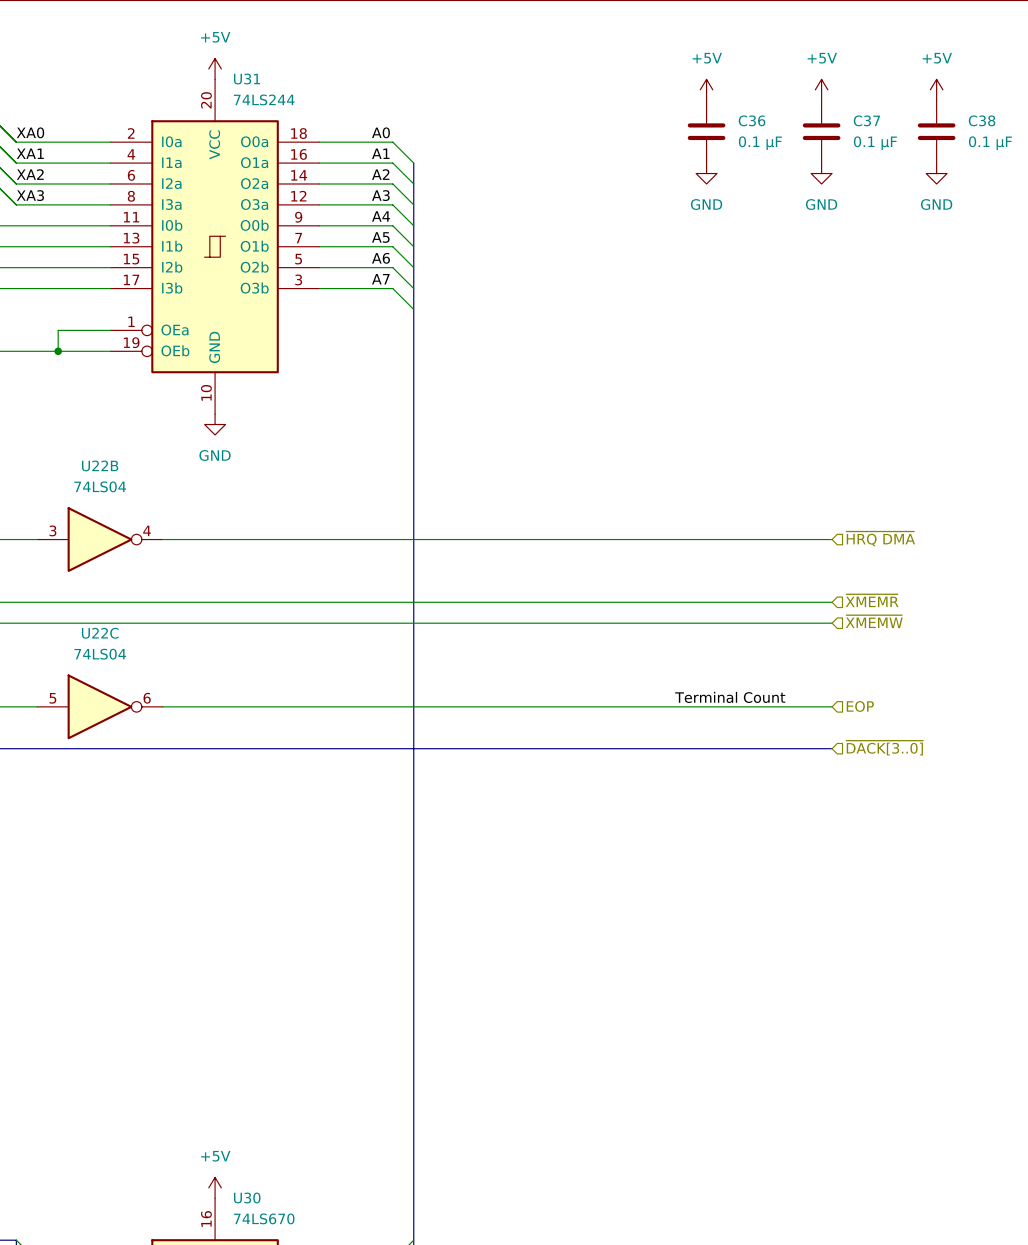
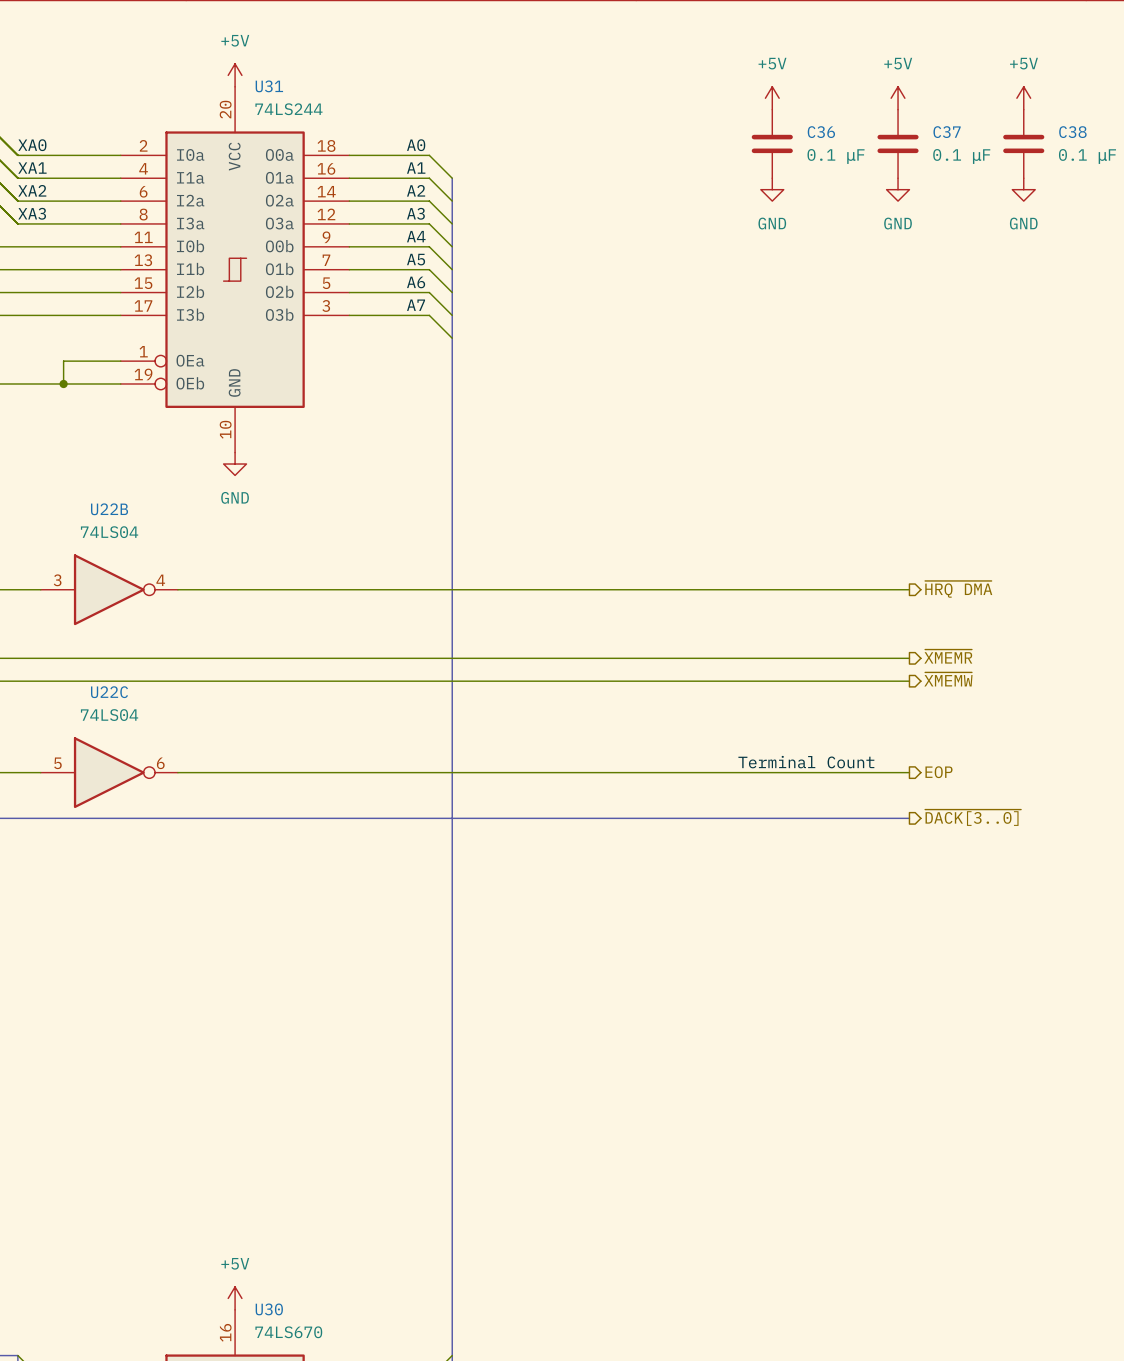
hierarchical label shape: input (880, 538) -> output (958, 589)
hierarchical label shape: input (872, 600) -> output (948, 656)
hierarchical label shape: input (874, 621) -> output (948, 679)
hierarchical label shape: input (860, 706) -> output (938, 772)
hierarchical label shape: input (884, 748) -> output (973, 817)

